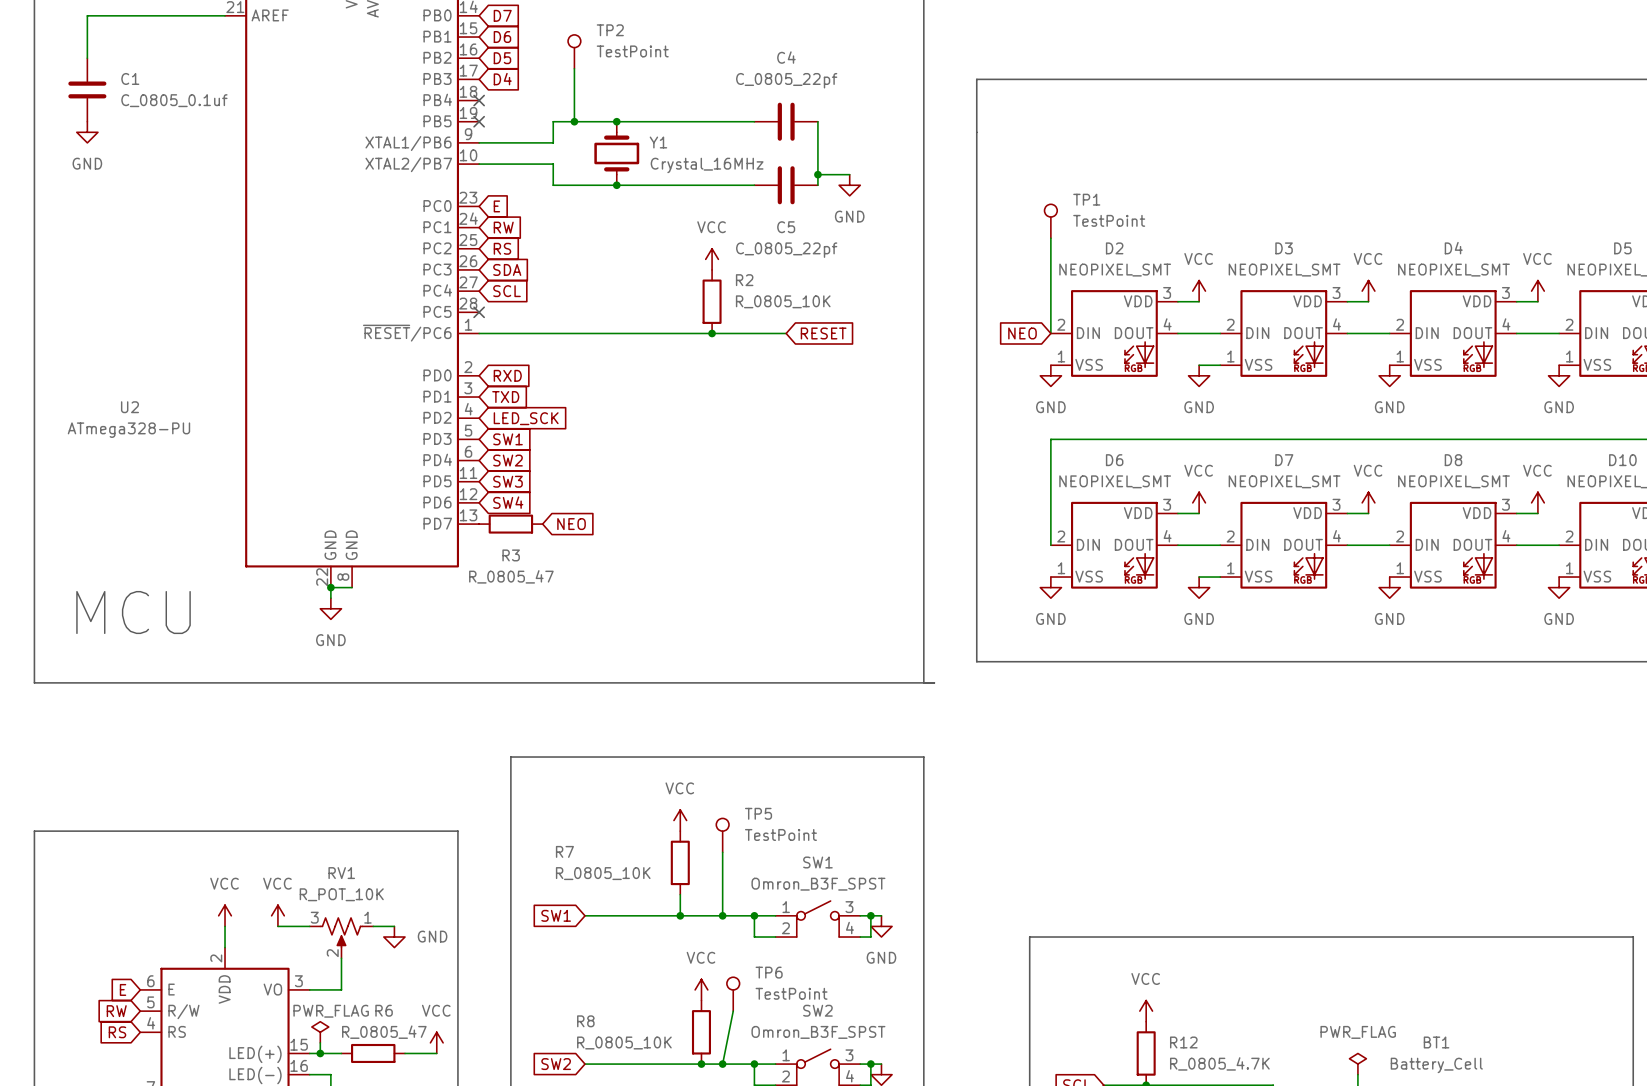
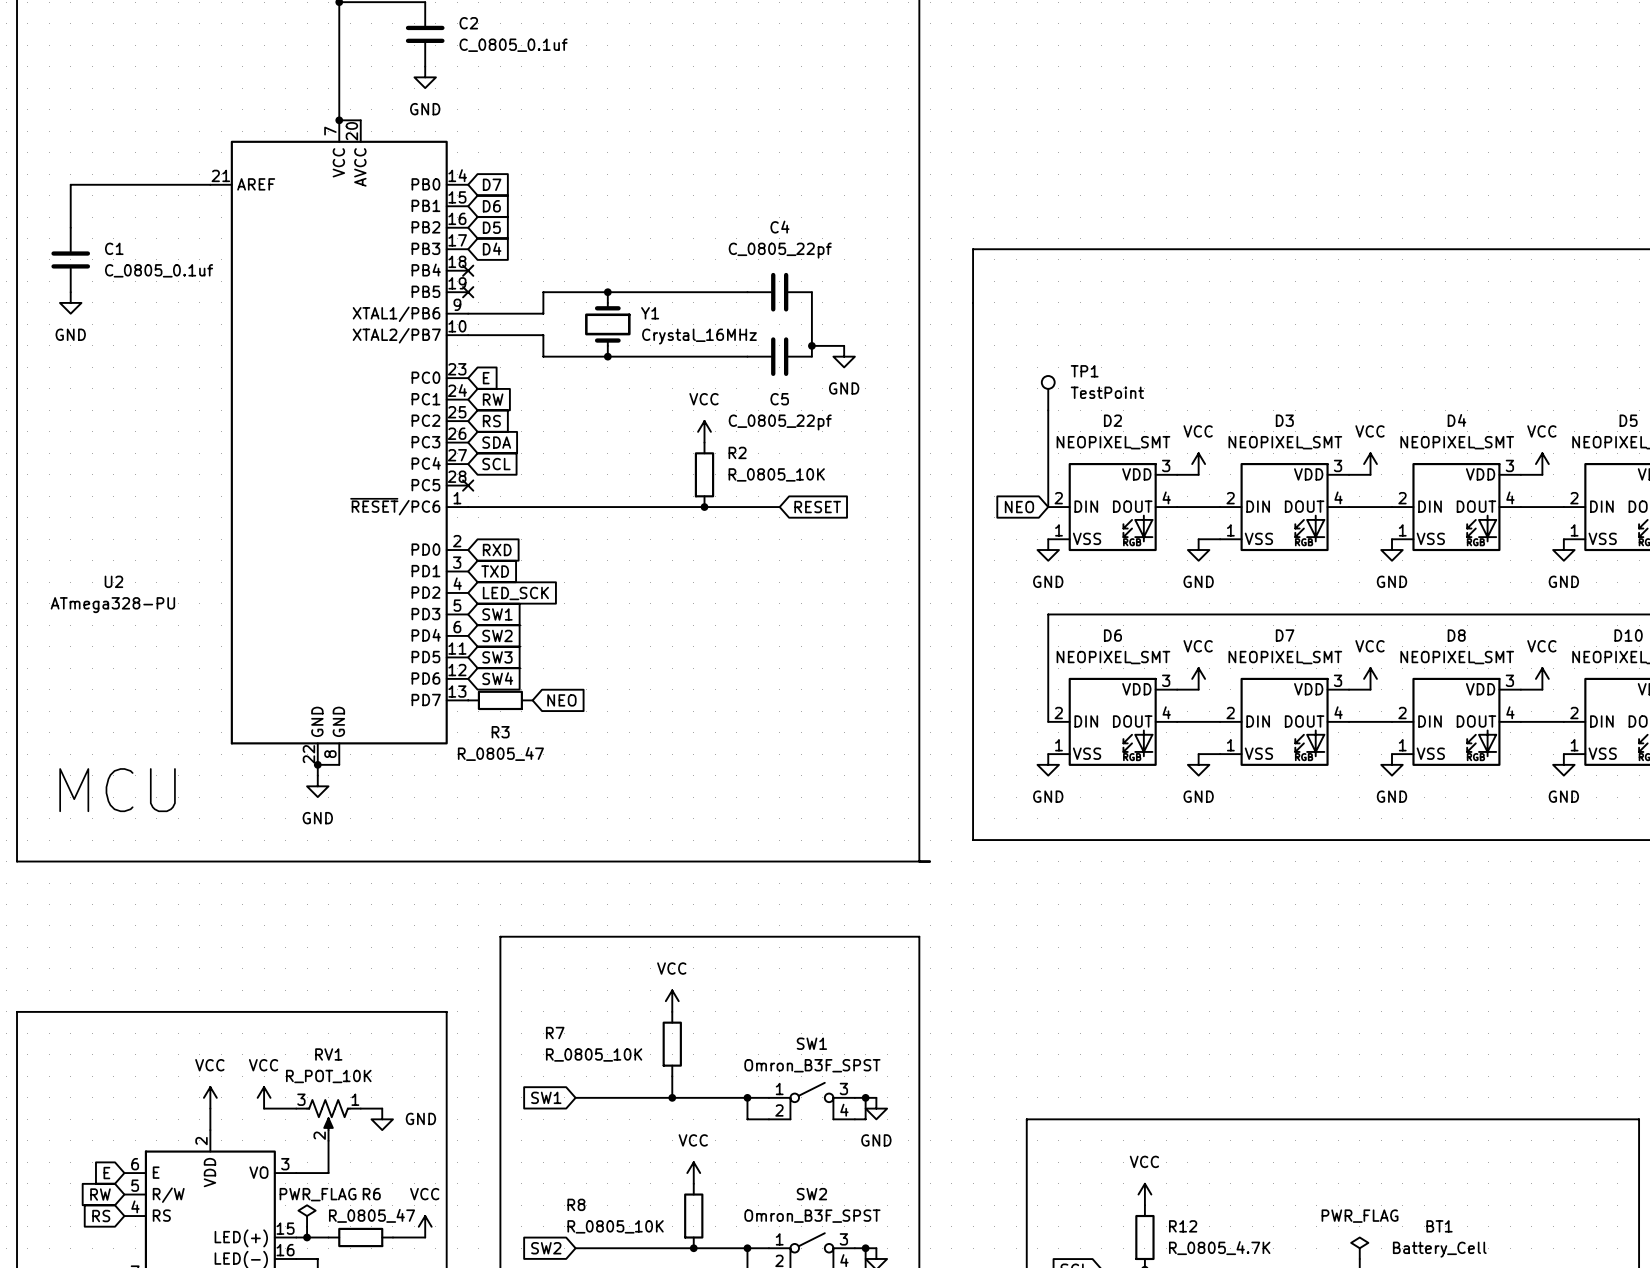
TP2: TestPoint (574, 51) -> none
wire: (574, 68) (574, 121) -> none
junction: (574, 121) -> none
TP5: TestPoint (722, 835) -> none
wire: (722, 852) (722, 915) -> none
junction: (722, 915) -> none
TP6: TestPoint (733, 994) -> none
wire: (733, 1011) (722, 1064) -> none
junction: (722, 1064) -> none

